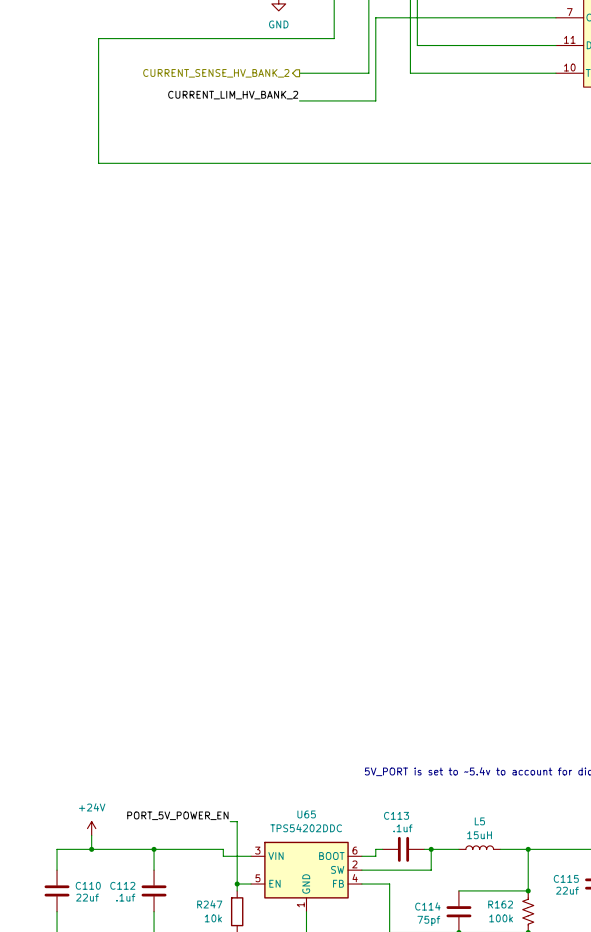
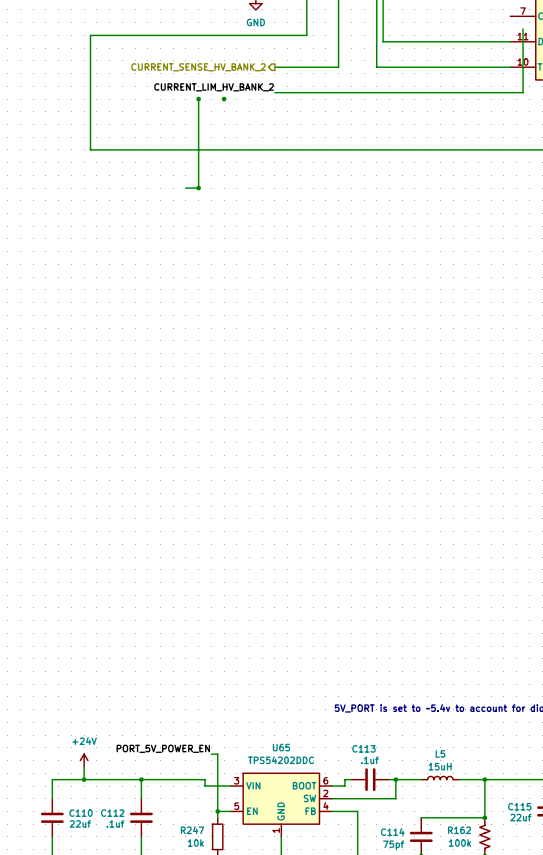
wire: (555, 17) (375, 17) (375, 100) -> (523, 29) (523, 92) (344, 92)
wire: none -> (198, 99) (198, 188) (185, 188)
junction: none -> (198, 99)
junction: none -> (224, 99)
junction: none -> (198, 188)

